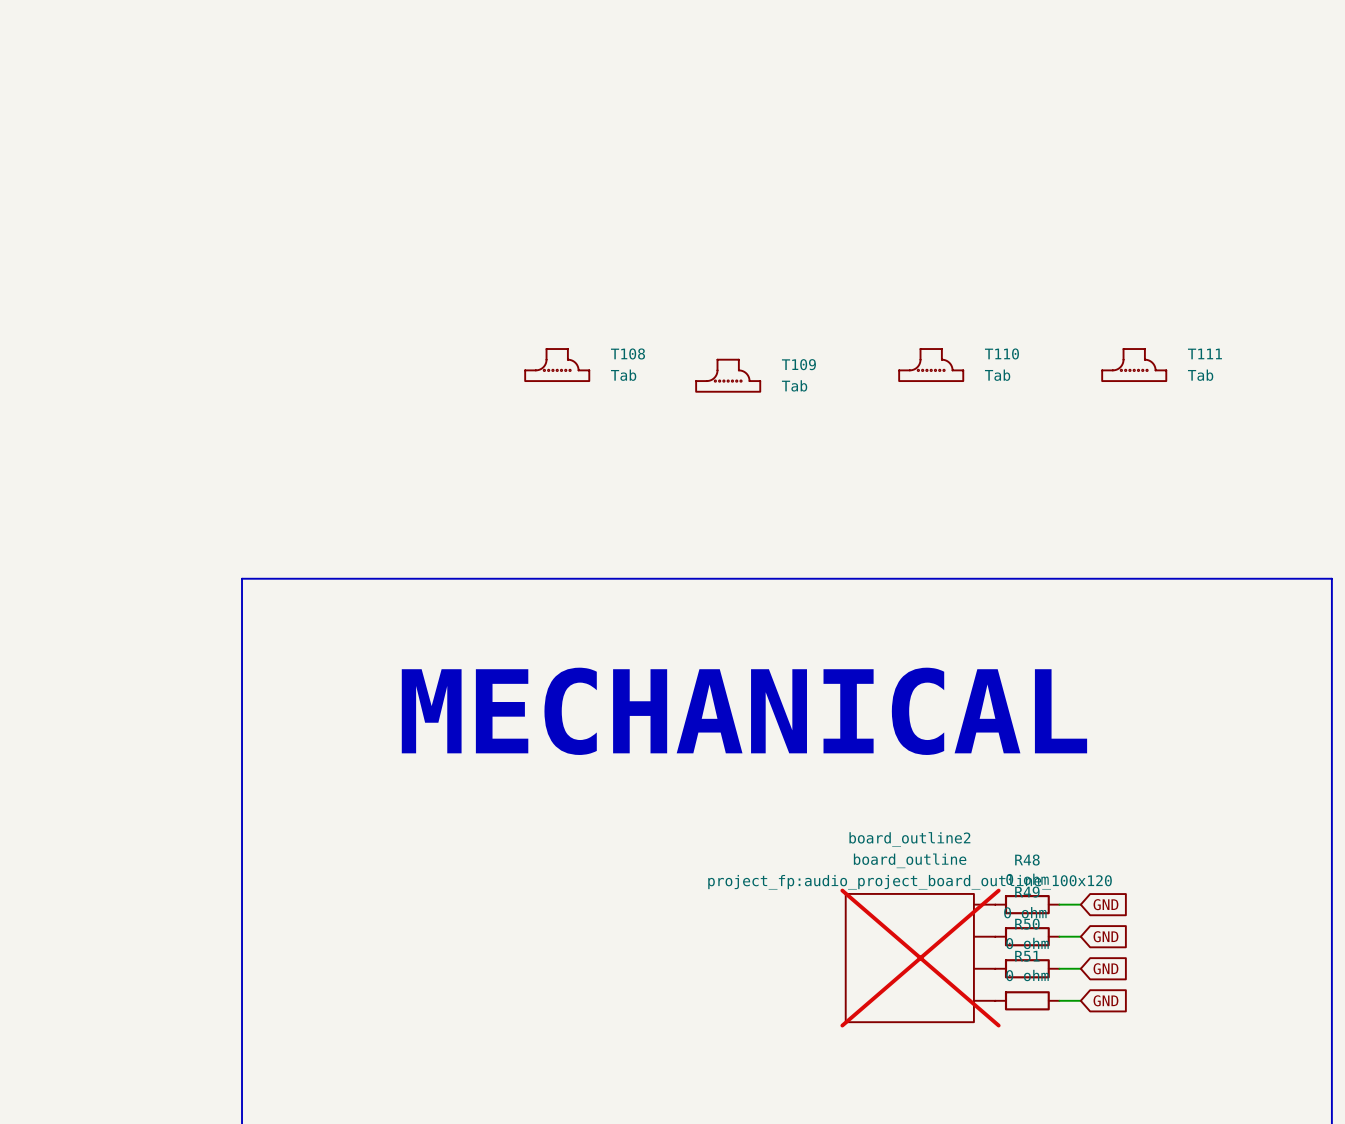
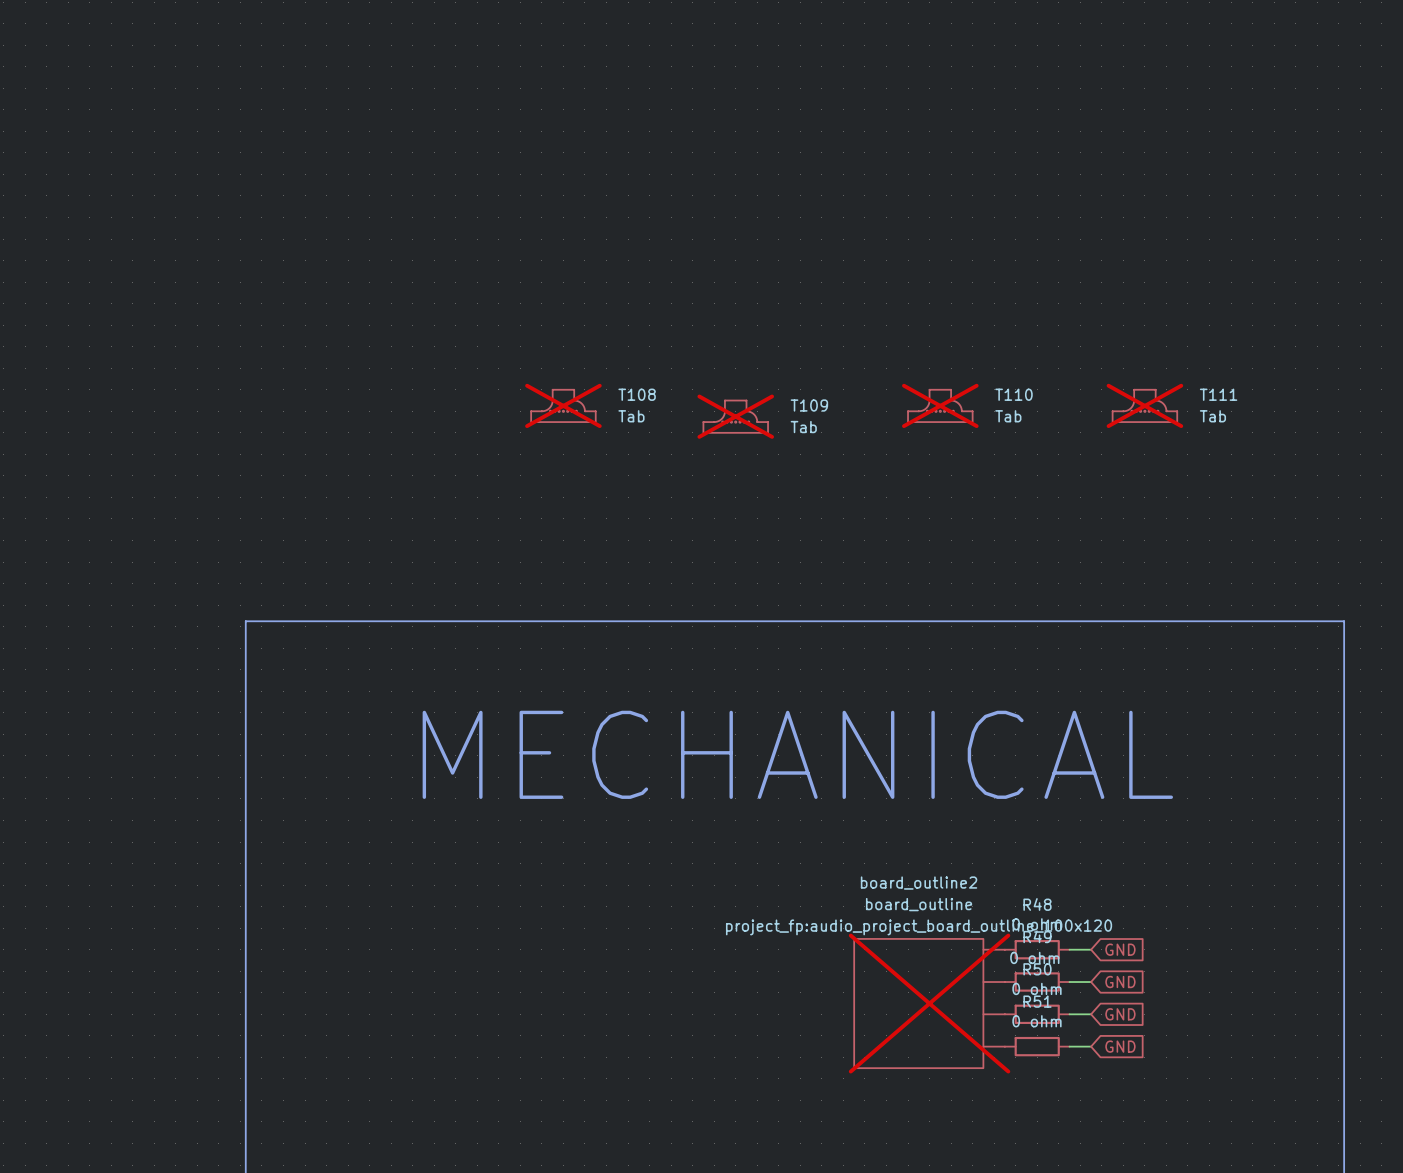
T108 do-not-place cross: none -> (563, 405)
T110 do-not-place cross: none -> (940, 405)
T111 do-not-place cross: none -> (1144, 405)
T109 do-not-place cross: none -> (735, 416)

